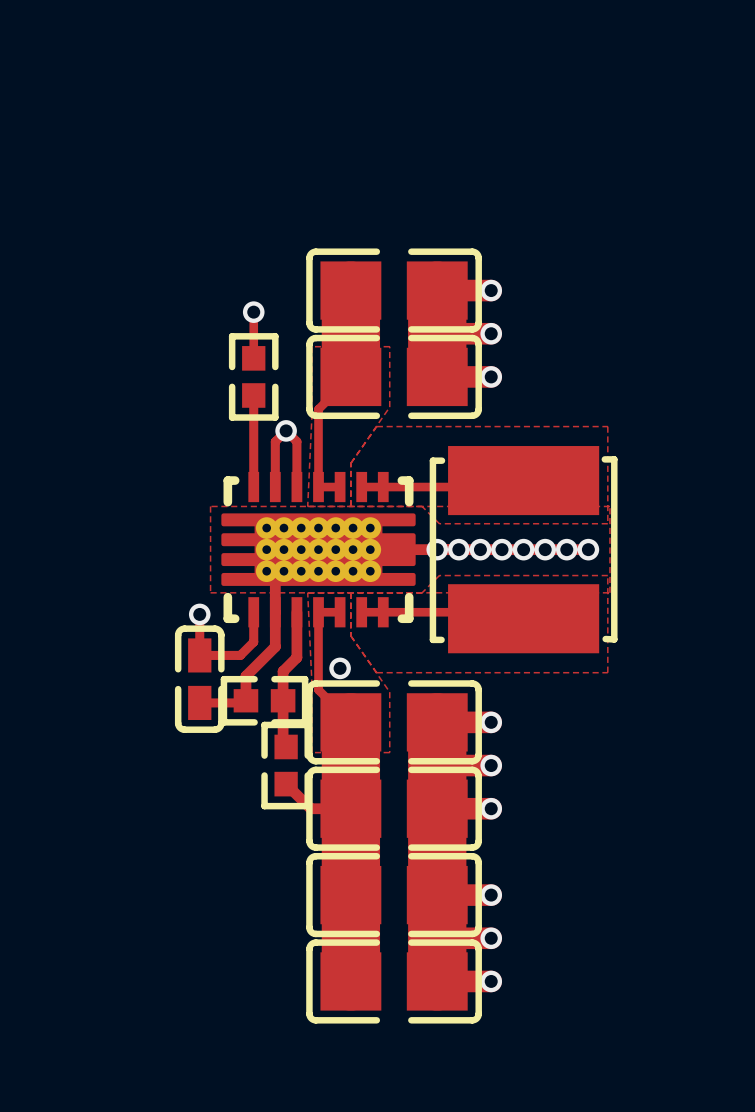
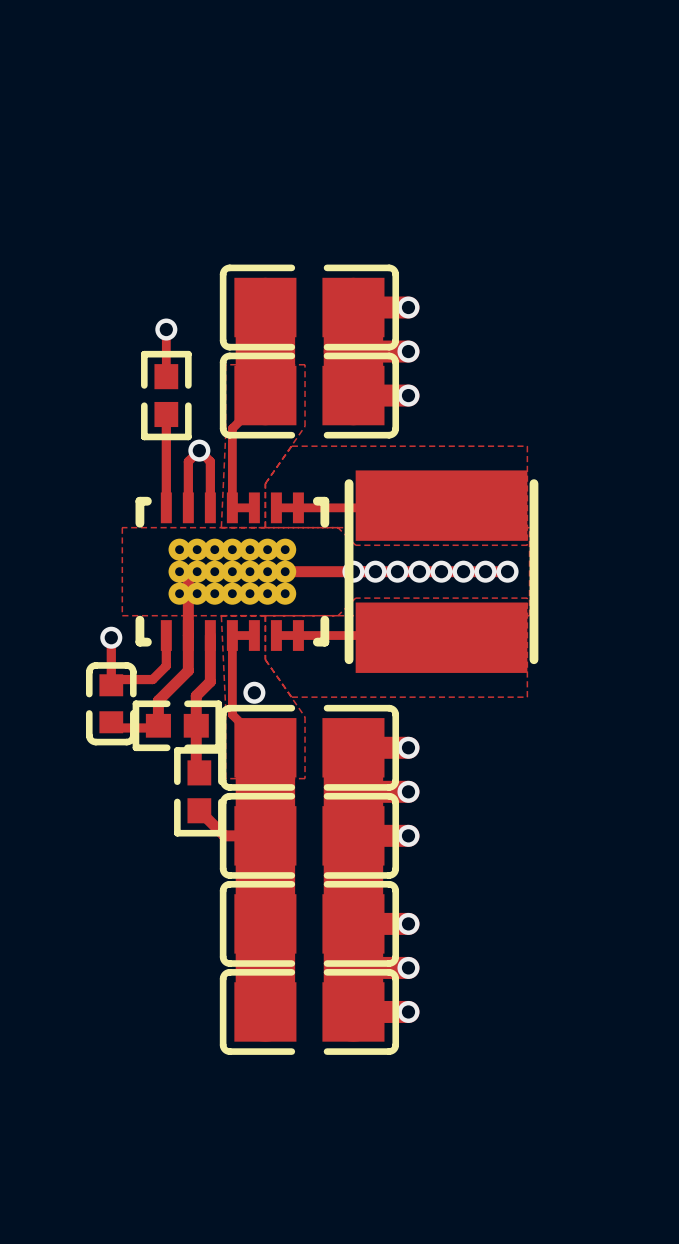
part footprint: [429, 446, 618, 654] -> [344, 470, 539, 673]
part footprint: [221, 471, 416, 641] -> [135, 492, 330, 664]
part footprint: [174, 625, 225, 733] -> [85, 662, 137, 746]

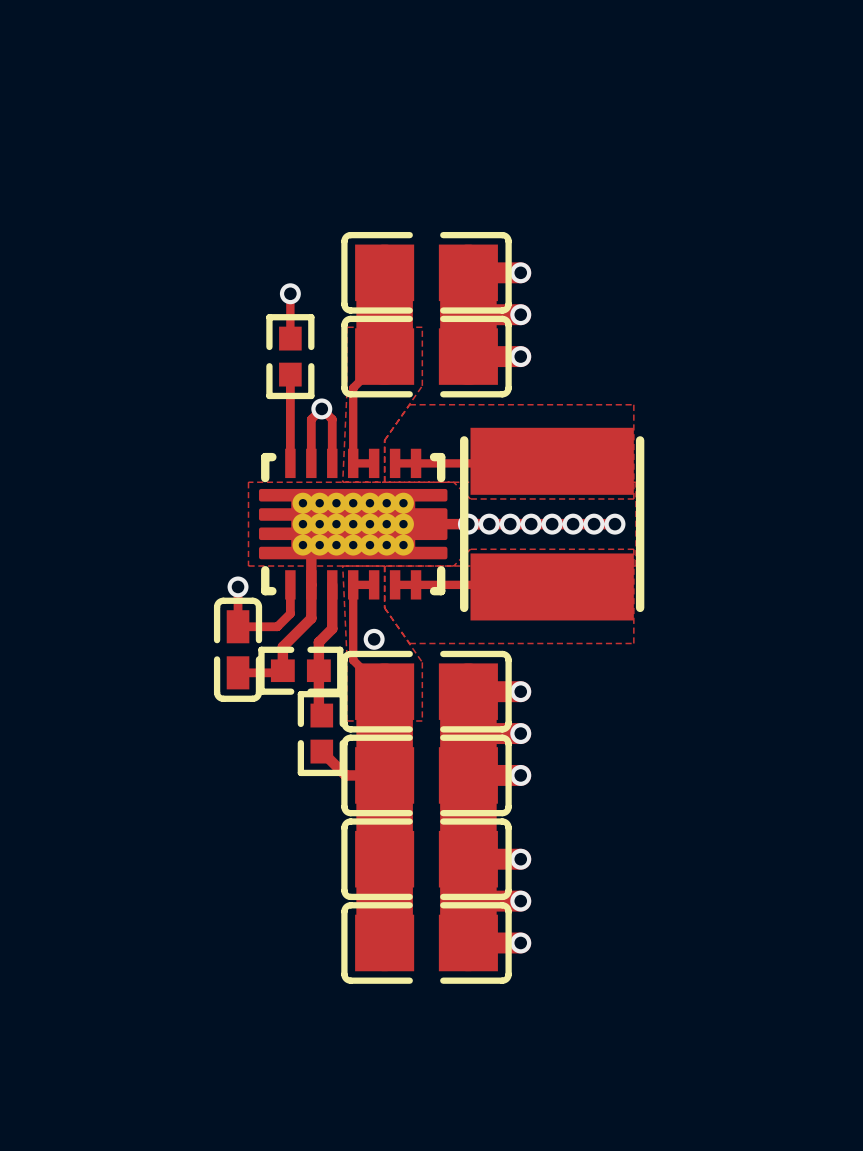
part footprint: [135, 492, 330, 664] -> [258, 448, 448, 612]
part footprint: [85, 662, 137, 746] -> [213, 597, 263, 702]

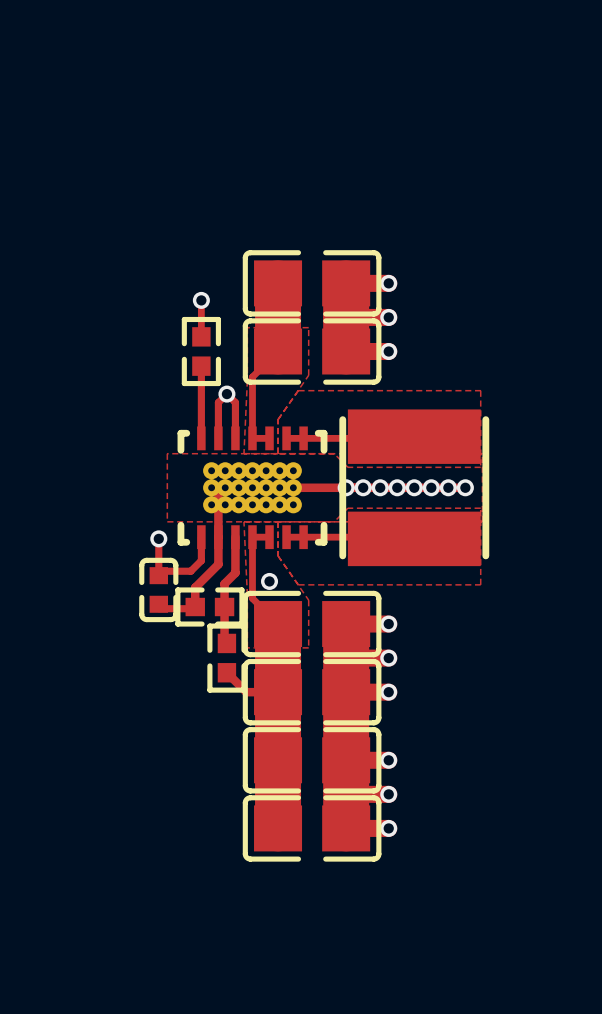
part footprint: [258, 448, 448, 612] -> [177, 426, 328, 560]
part footprint: [213, 597, 263, 702] -> [139, 557, 179, 623]

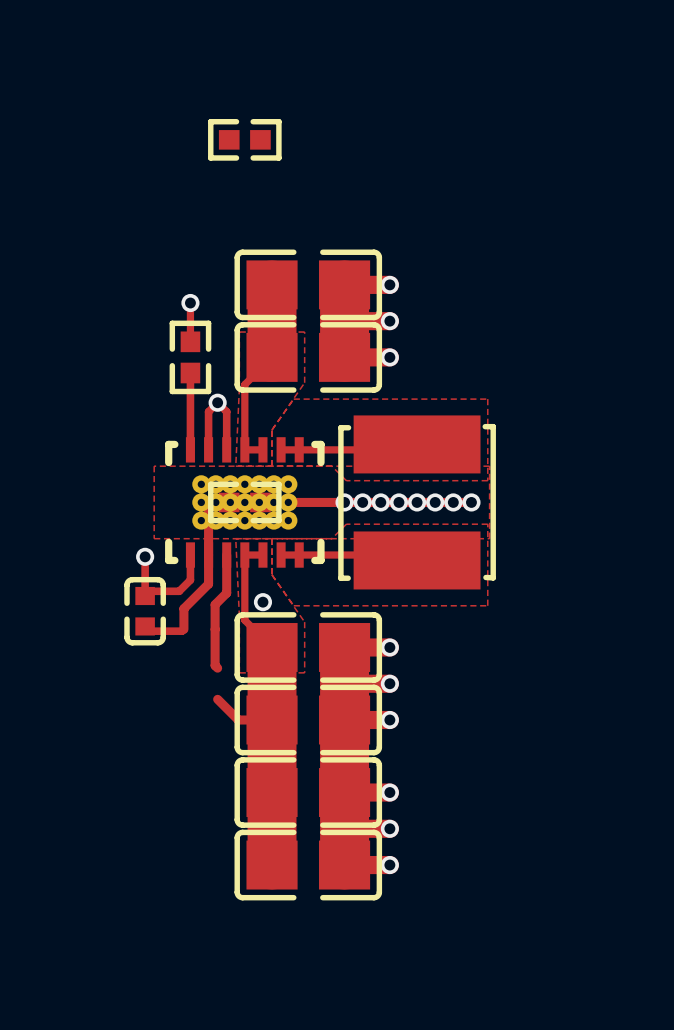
part: none -> (244, 139)
part footprint: [339, 409, 490, 567] -> [338, 415, 496, 590]
part: none -> (244, 502)
part: (209, 607) -> none
part: (226, 658) -> none

